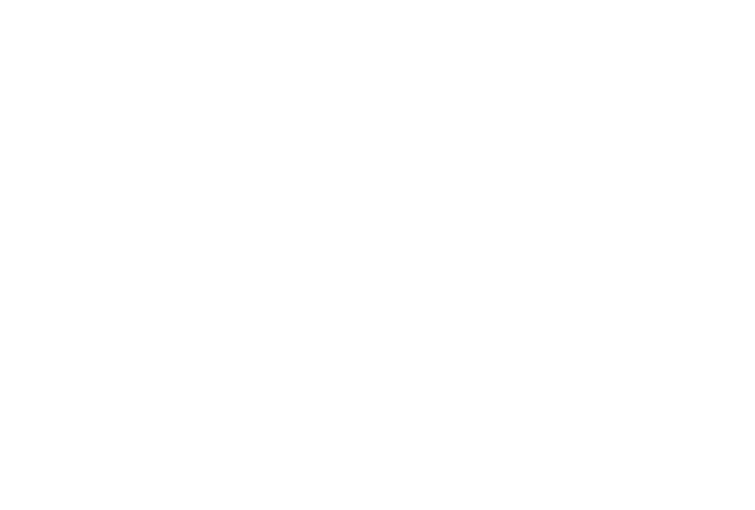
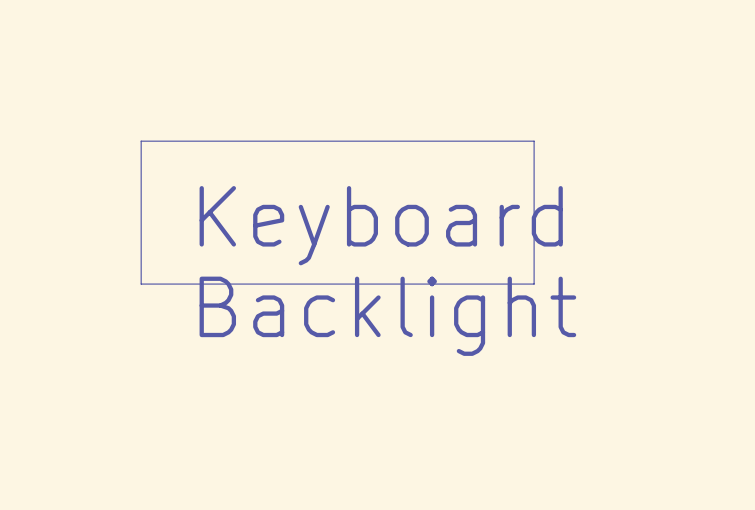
line: none -> (141, 141) (534, 141) (534, 284) (141, 284) (141, 141)
text: none -> Keyboard (381, 225)
text: none -> Backlight (387, 316)

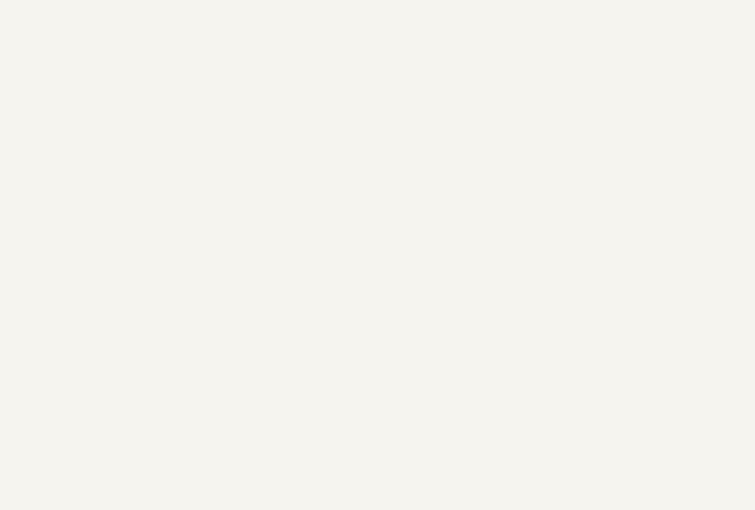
line: (141, 141) (534, 141) (534, 284) (141, 284) (141, 141) -> none
text: Keyboard (381, 225) -> none
text: Backlight (387, 316) -> none

